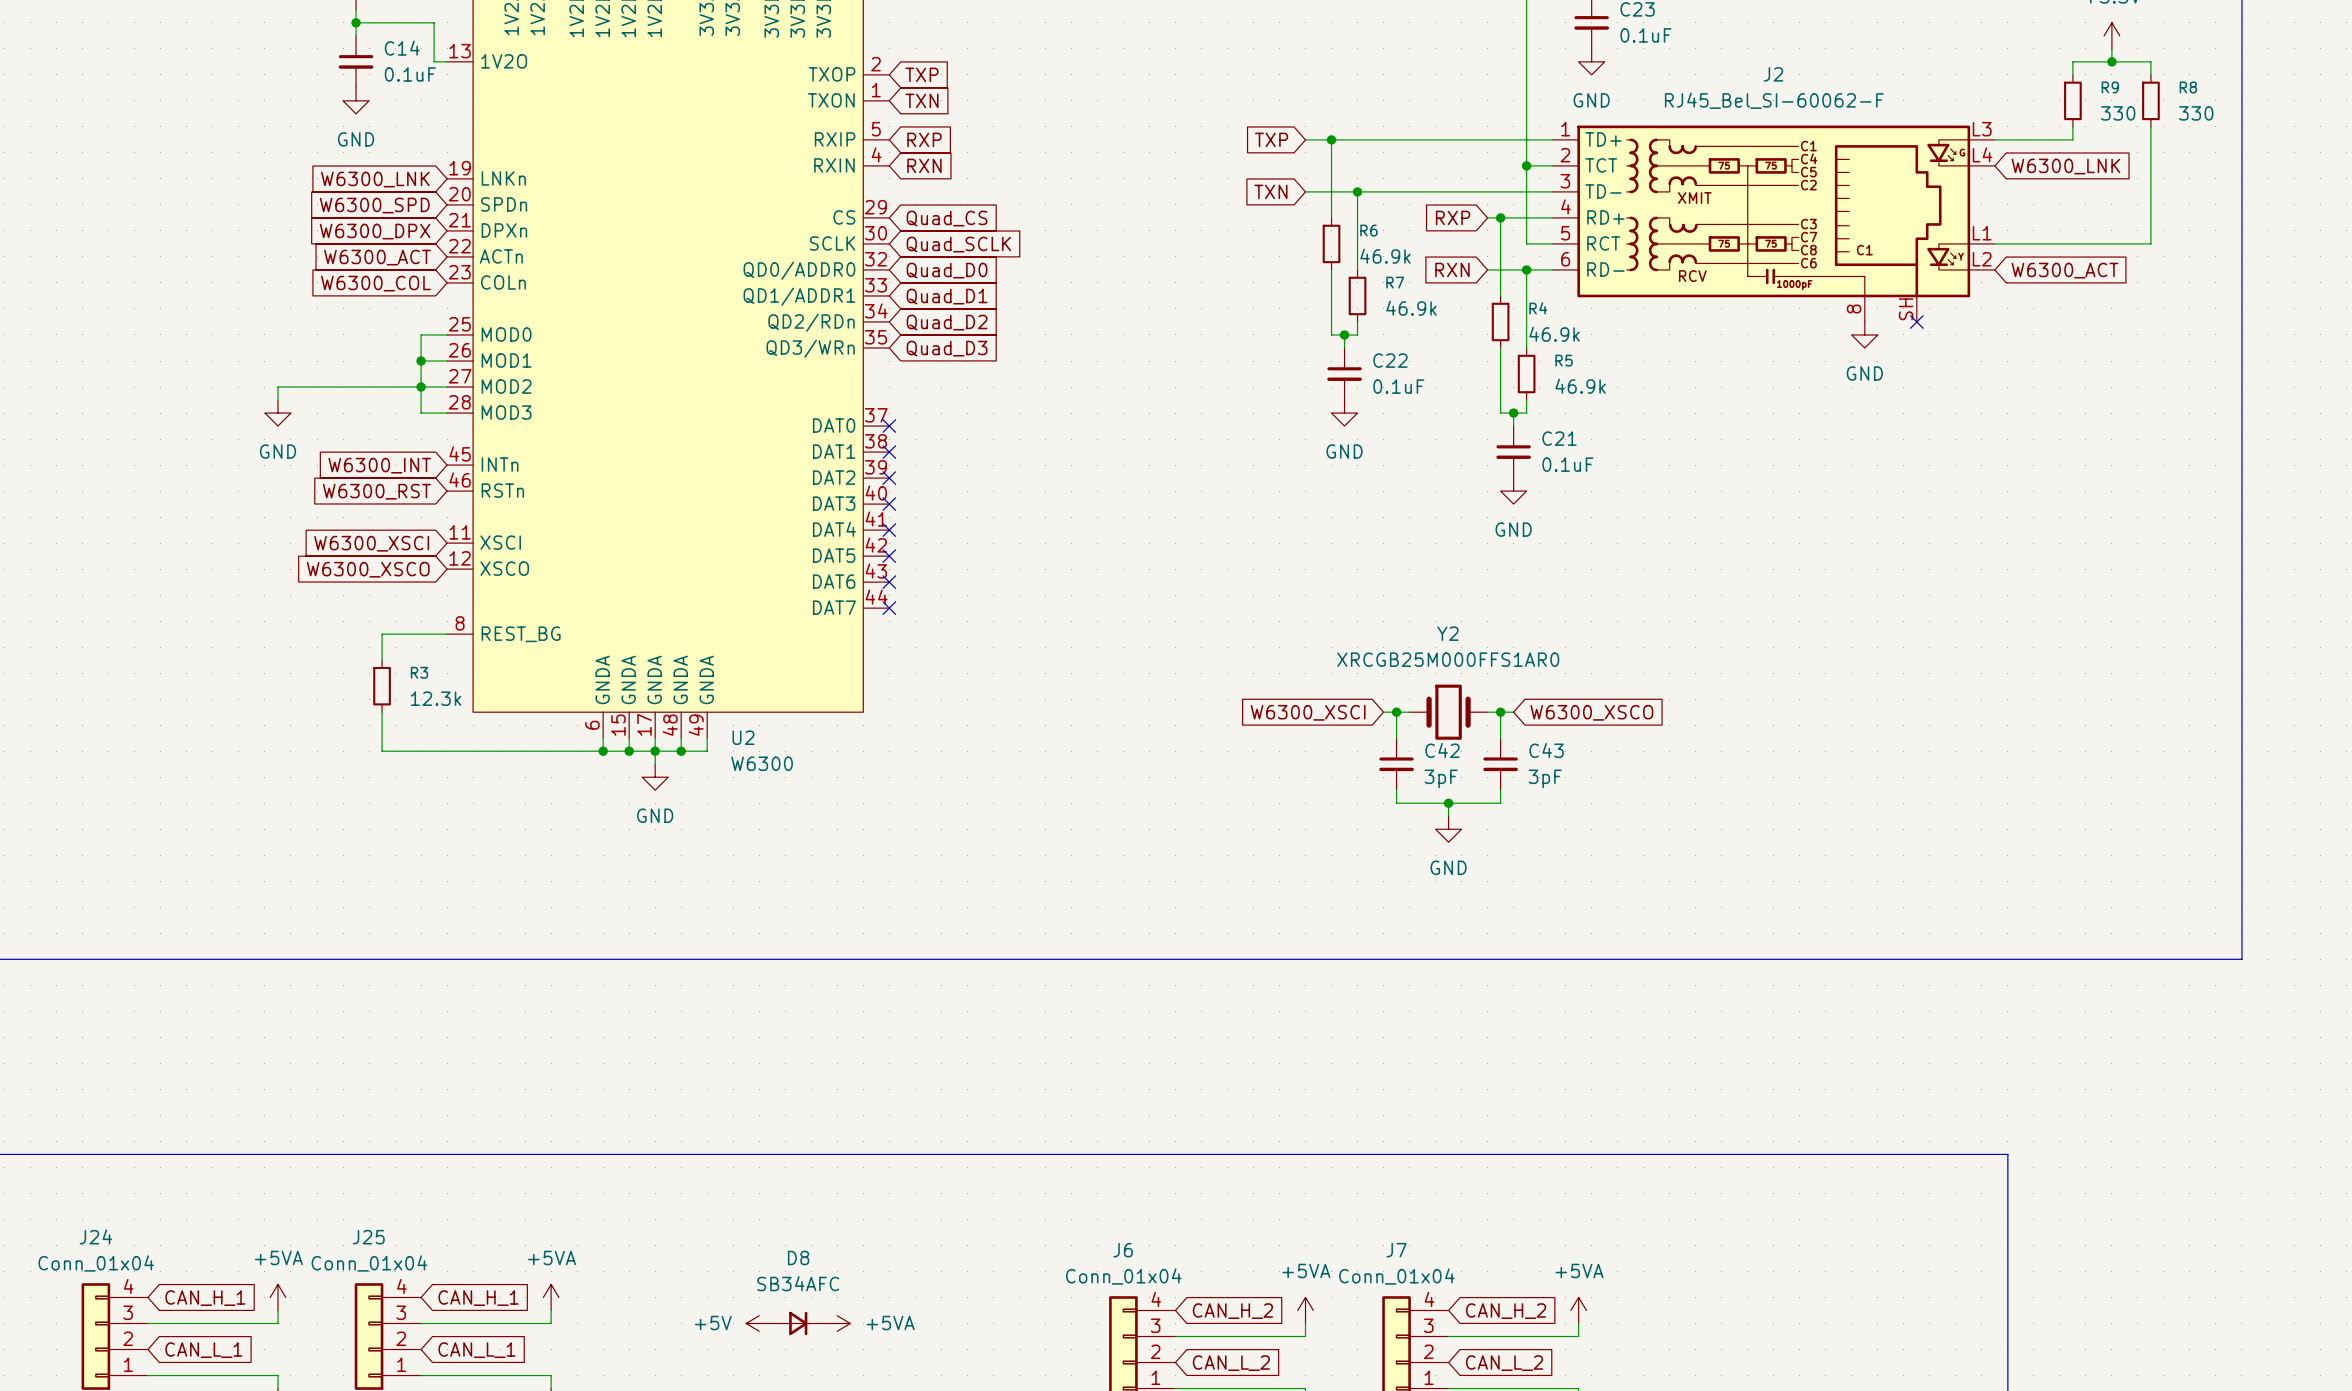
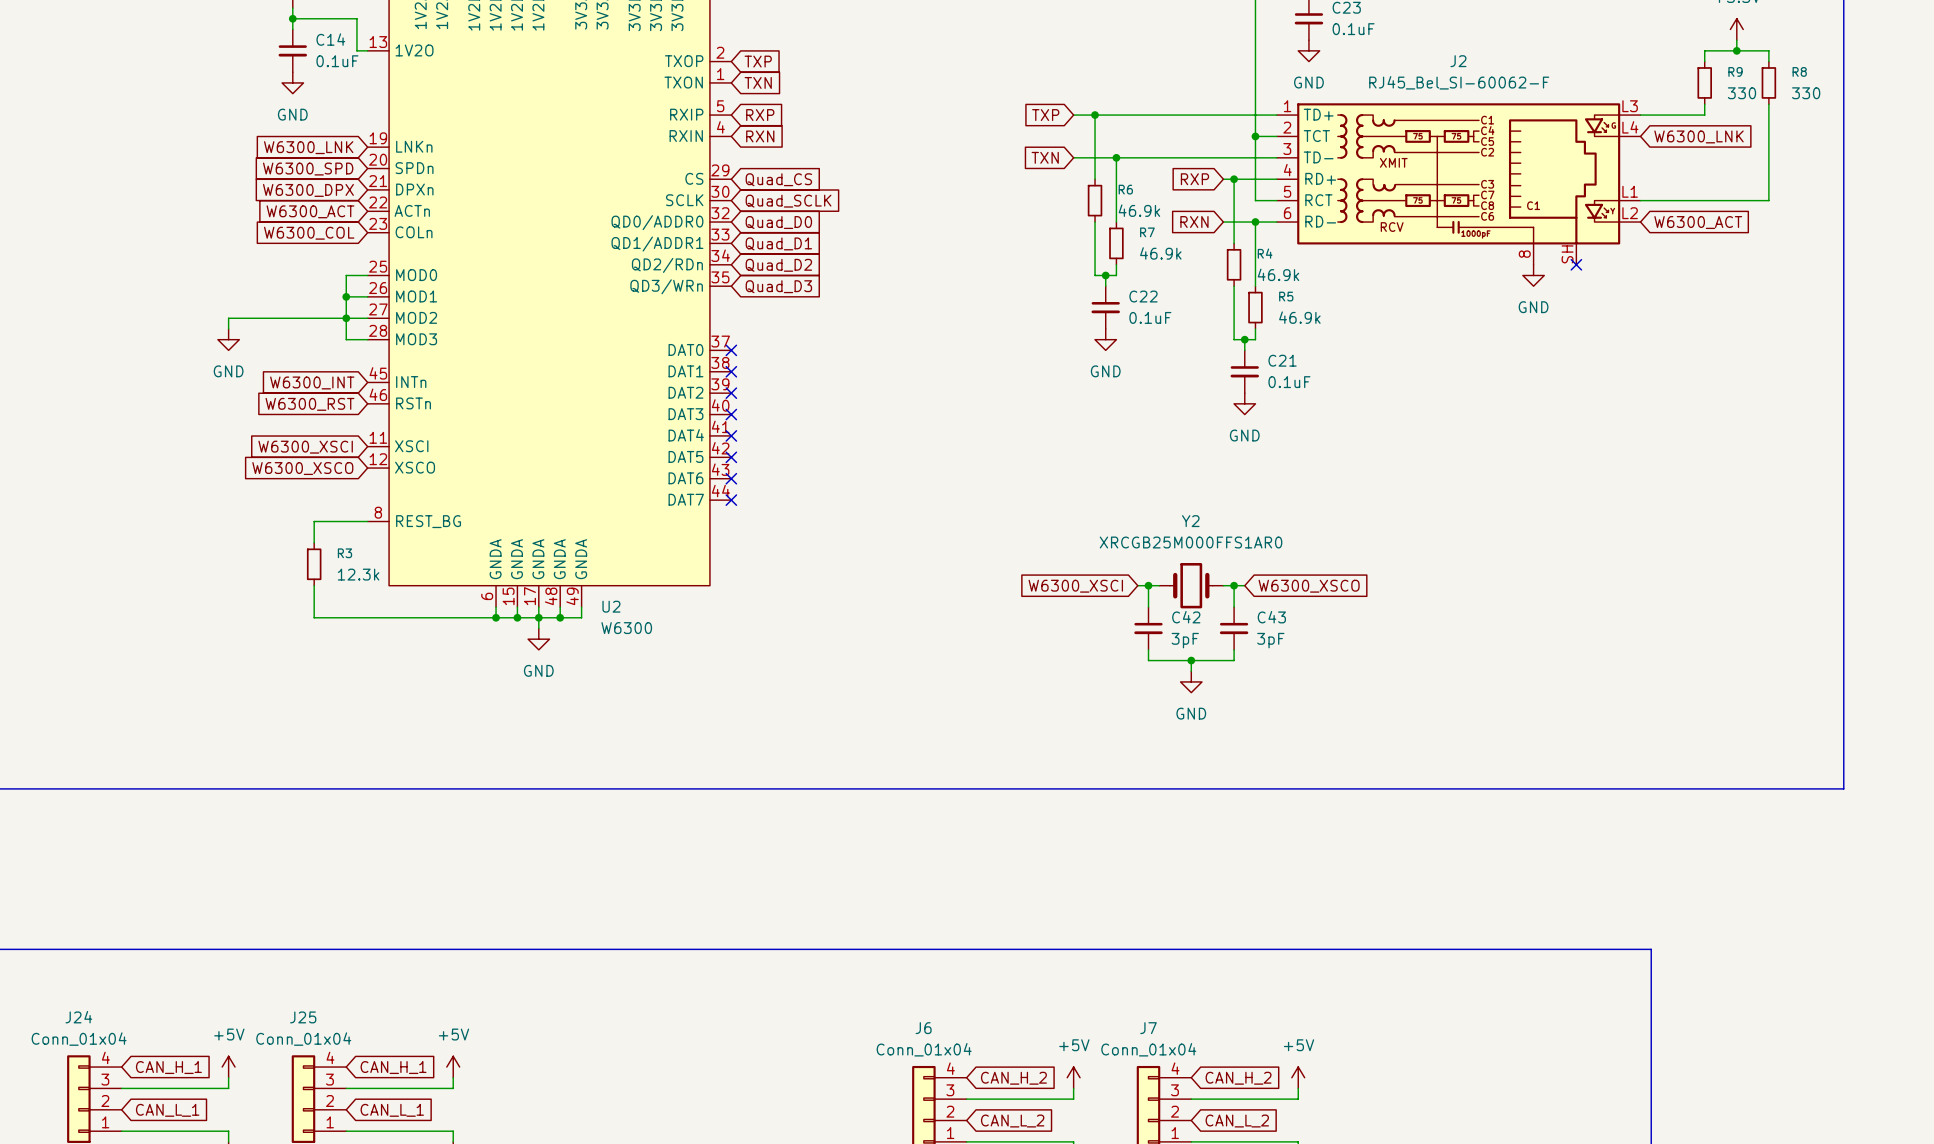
power symbol: +5VA (277, 1297) -> +5V (228, 1067)
power symbol: +5VA (551, 1297) -> +5V (453, 1067)
power symbol: +5VA (1305, 1310) -> +5V (1073, 1077)
power symbol: +5VA (1578, 1310) -> +5V (1298, 1077)
power symbol: +5V (759, 1323) -> none
D8: SB34AFC (798, 1323) -> none
power symbol: +5VA (837, 1323) -> none

